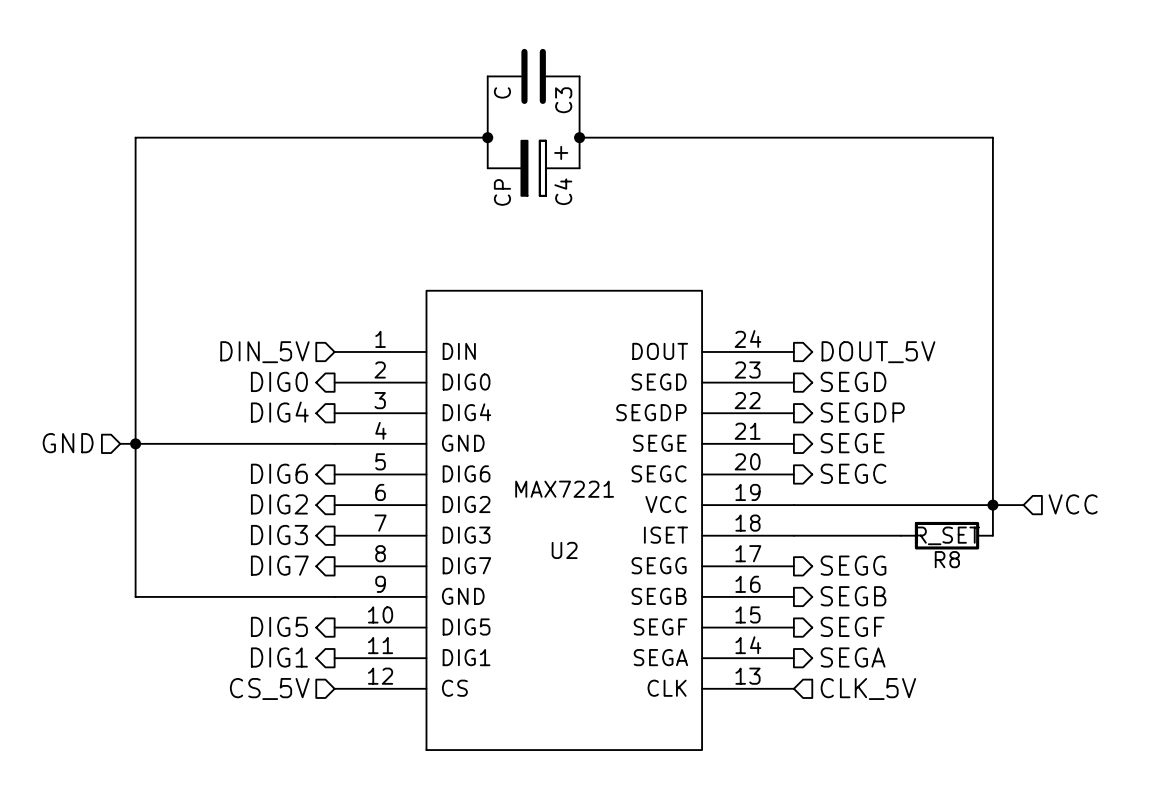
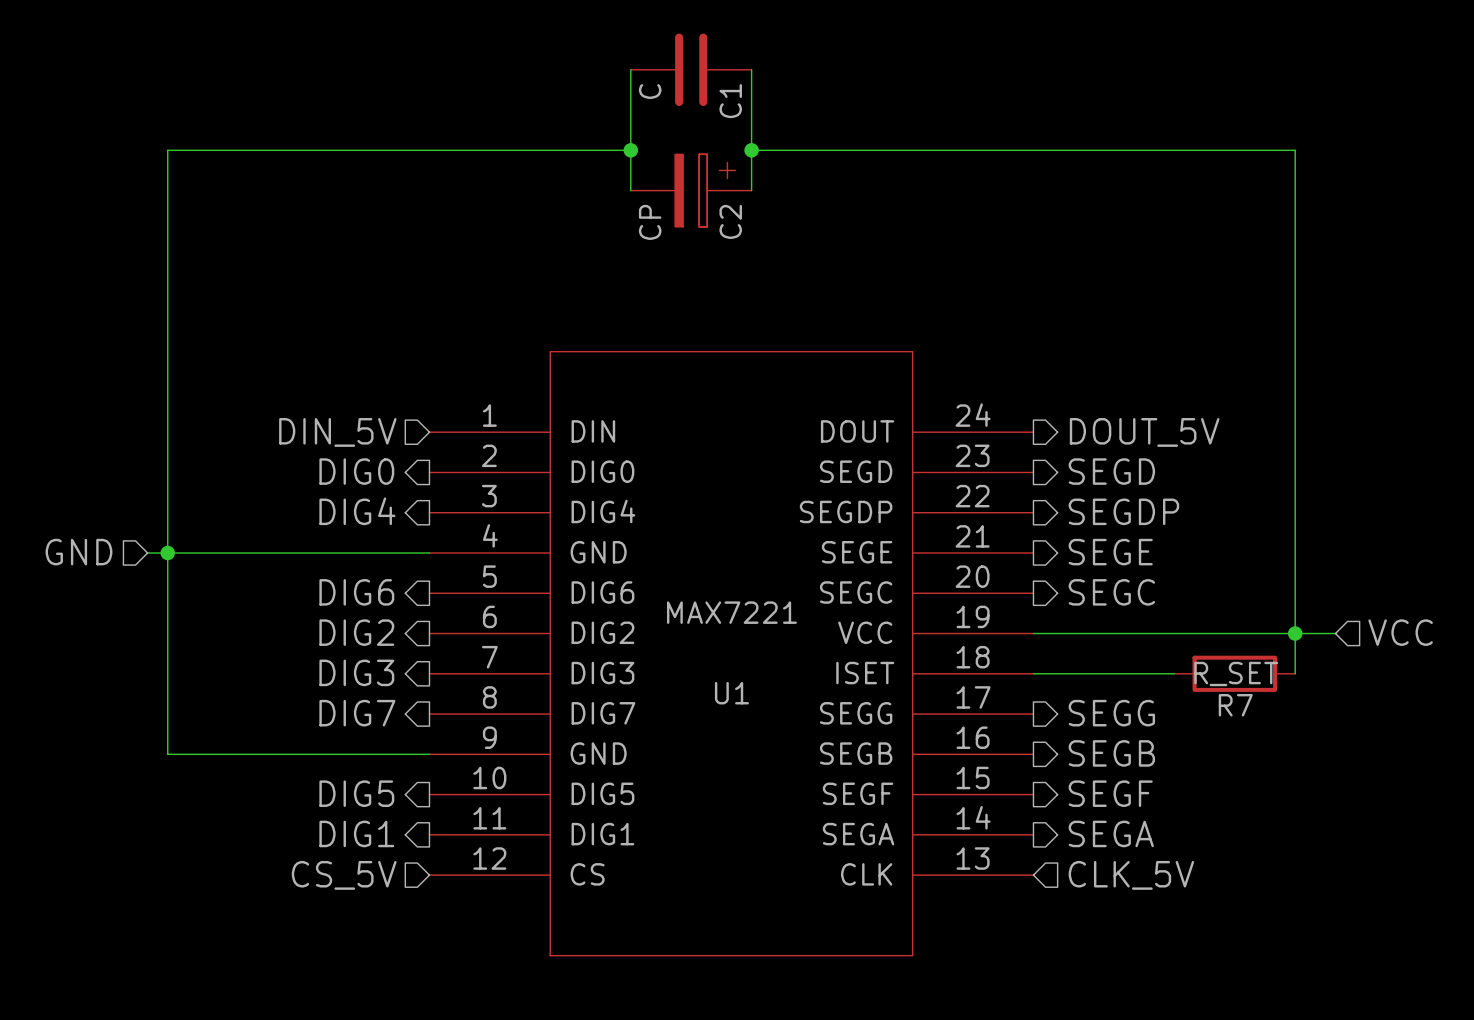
C3 name: C3 (563, 100) -> C1 (730, 101)
C4 name: C4 (563, 191) -> C2 (730, 221)
U2 name: U2 (564, 550) -> U1 (731, 693)
R8 name: R8 (947, 559) -> R7 (1235, 705)

